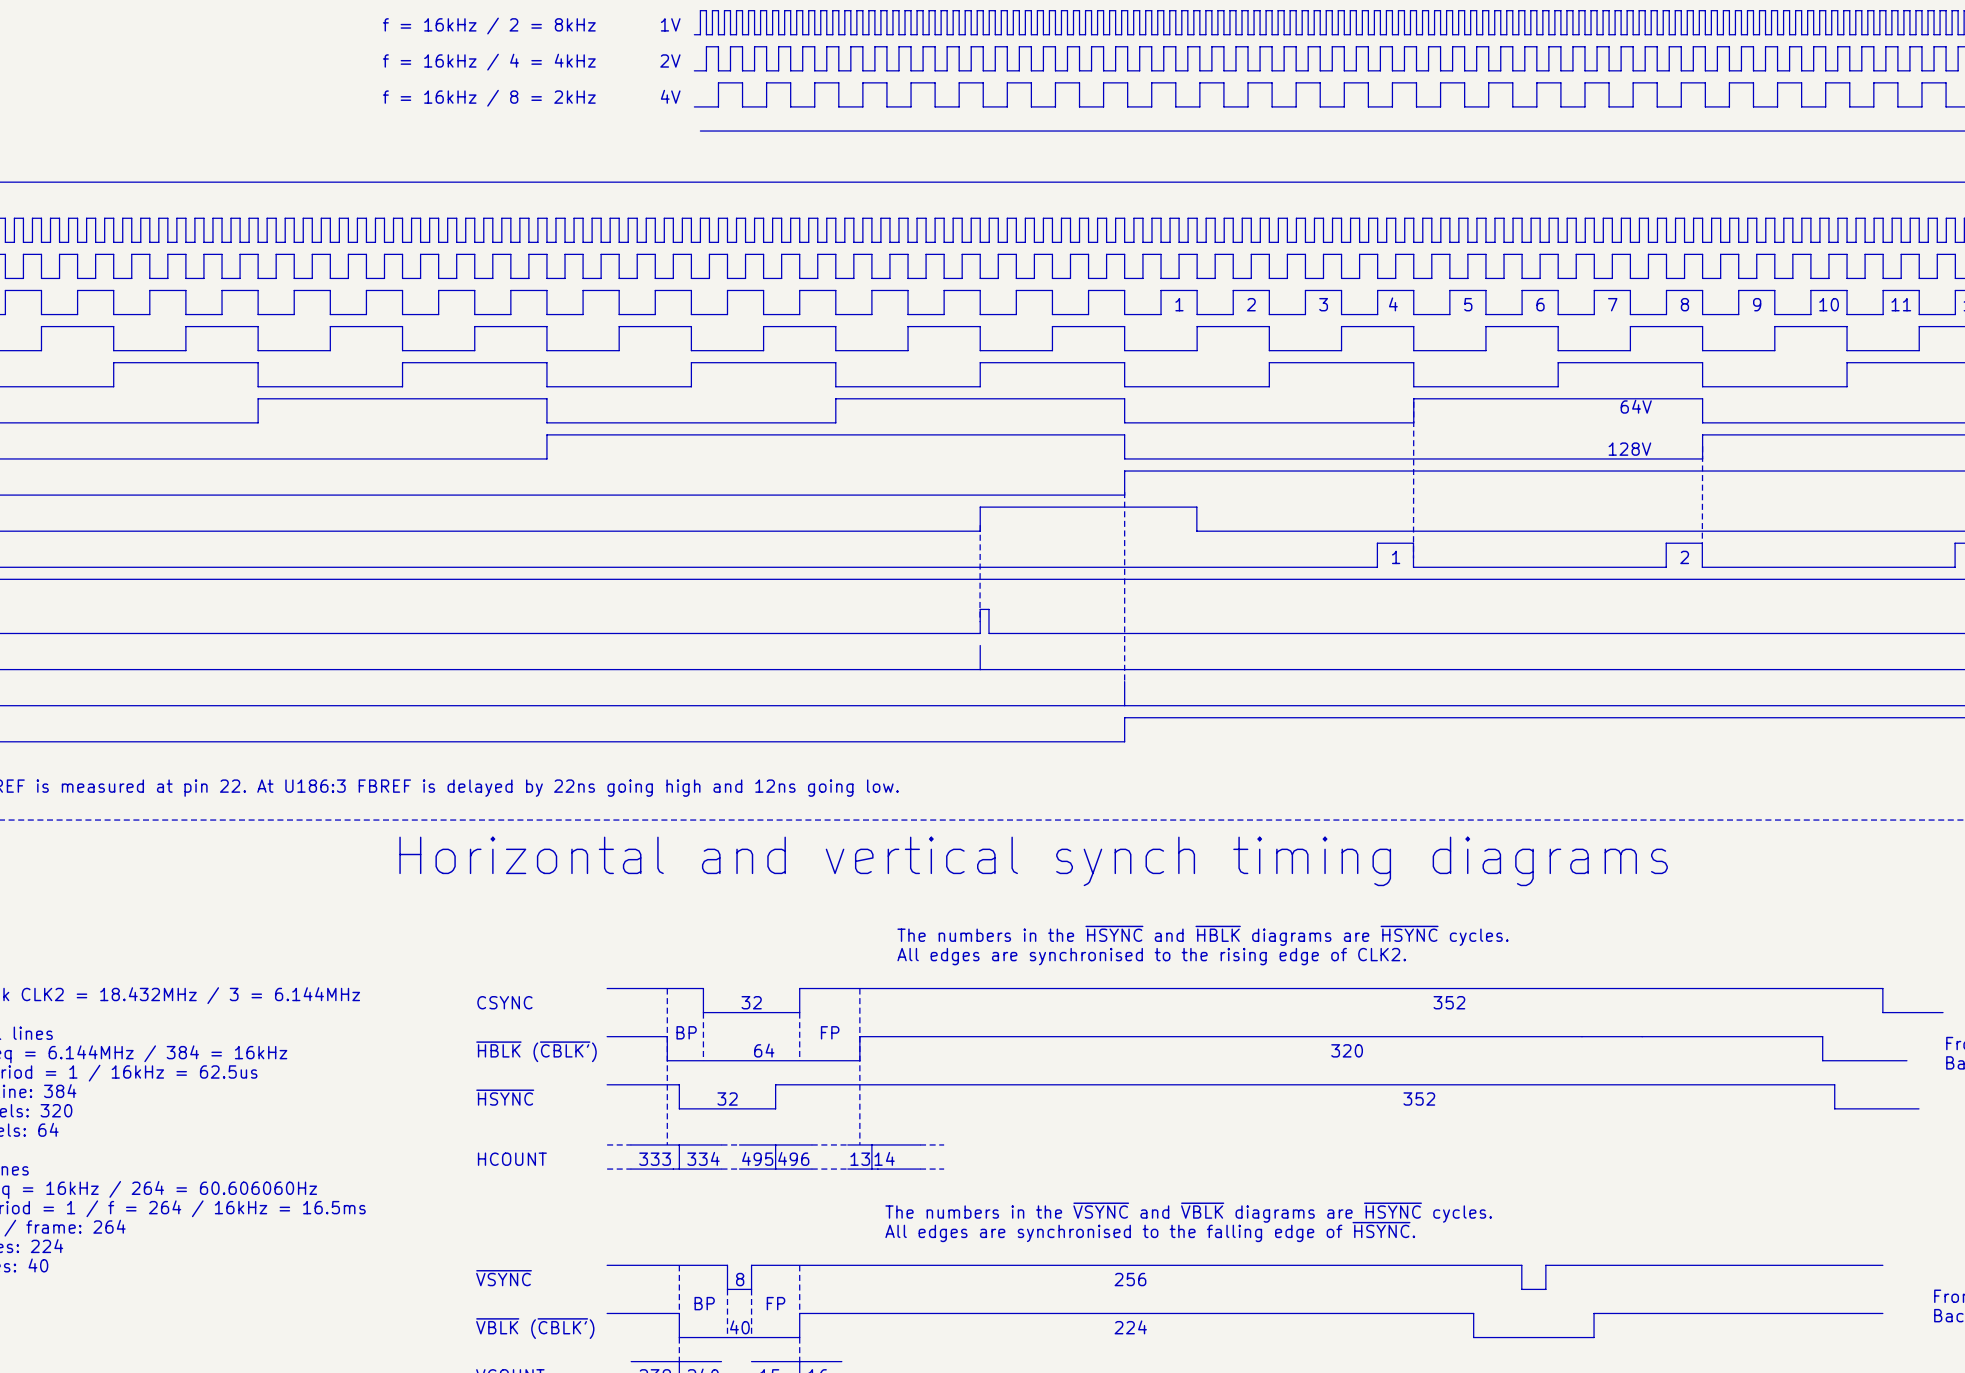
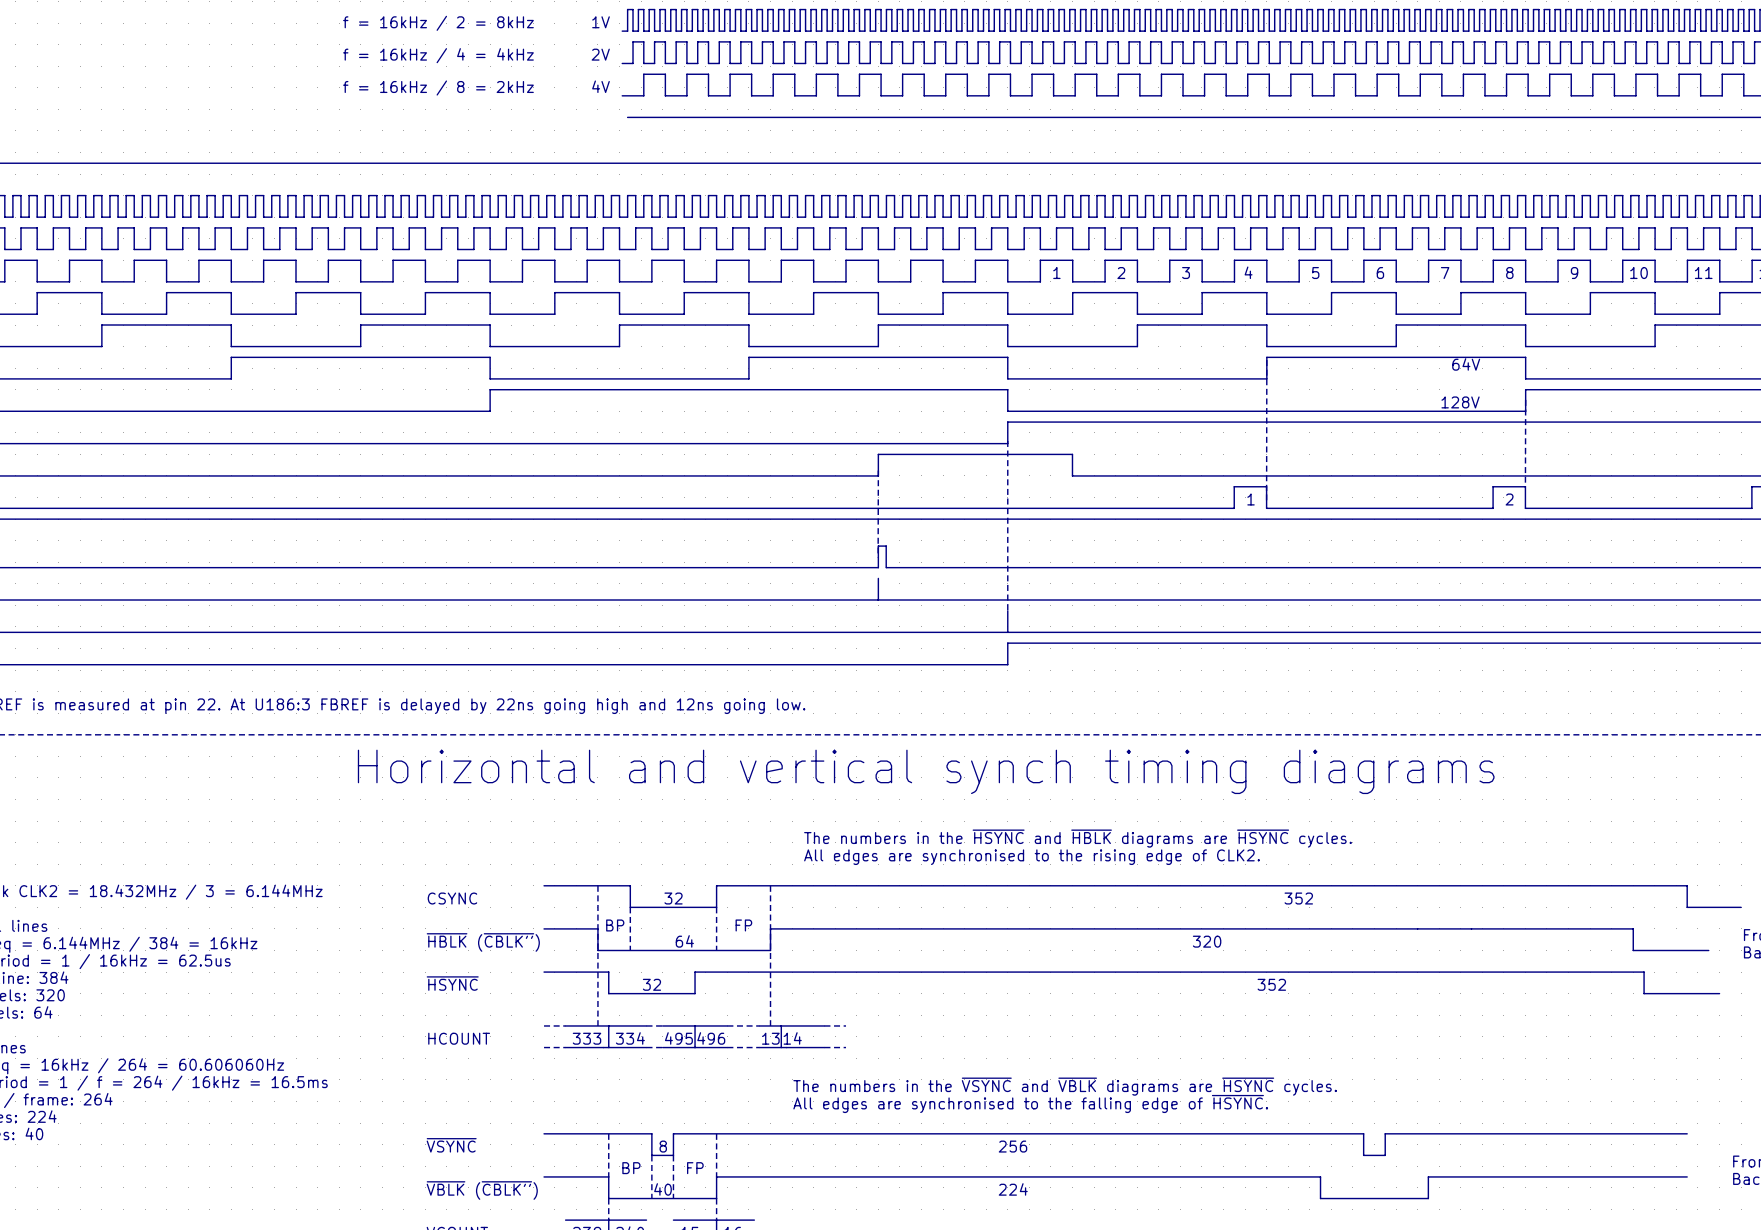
text: ~{HBLK} (~{CBLK'}) (536, 1051) -> ~{HBLK} (~{CBLK''}) (483, 942)
text: ~{VBLK} (~{CBLK'}) (535, 1328) -> ~{VBLK} (~{CBLK''}) (482, 1190)

